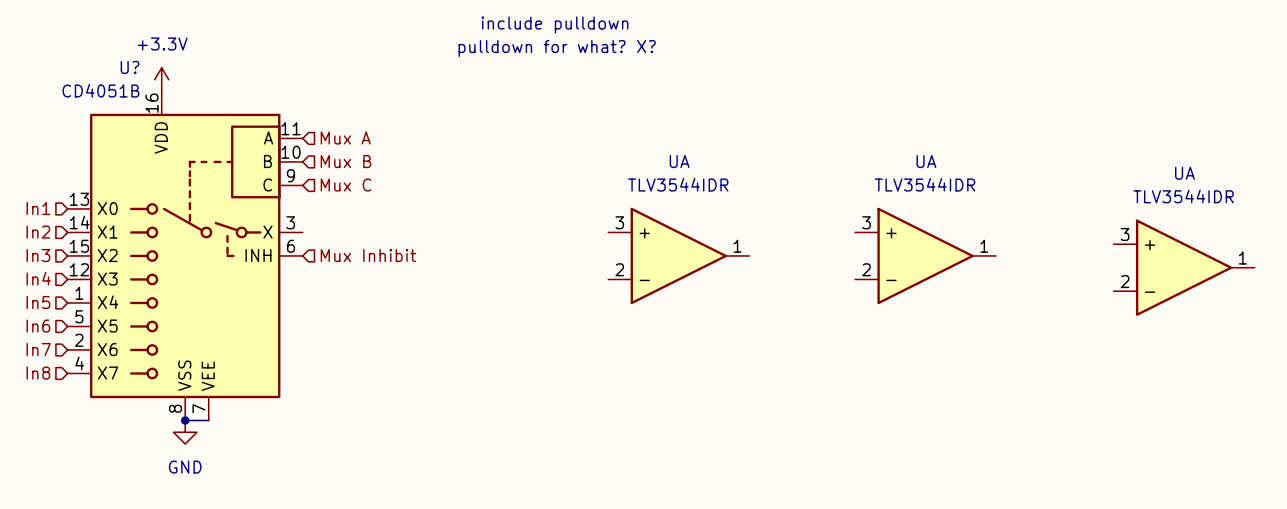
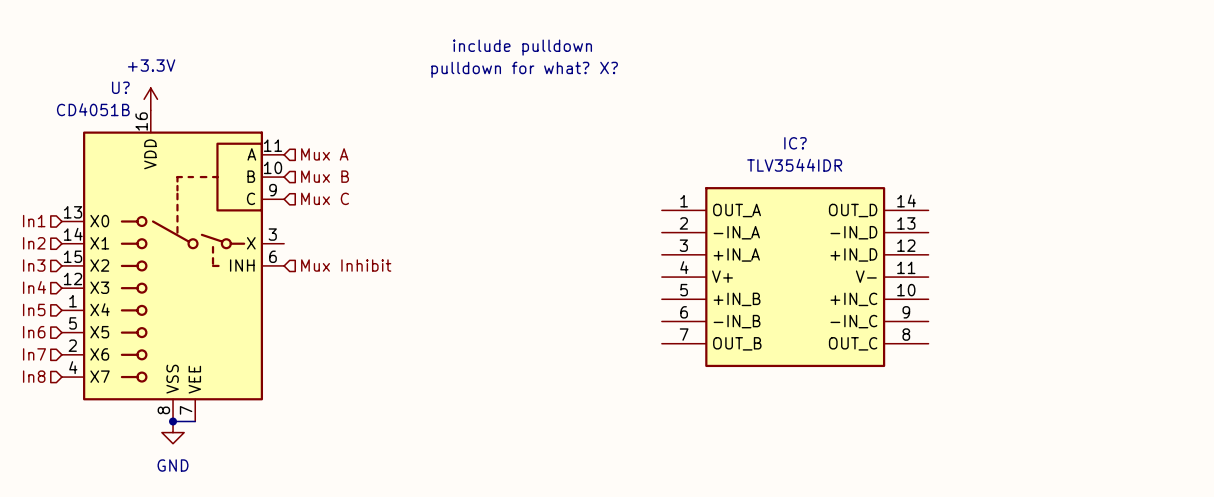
UA: TLV3544IDR (678, 255) -> none
UA: TLV3544IDR (925, 255) -> none
IC?: none -> TLV3544IDR (795, 277)
UA: TLV3544IDR (1184, 267) -> none

